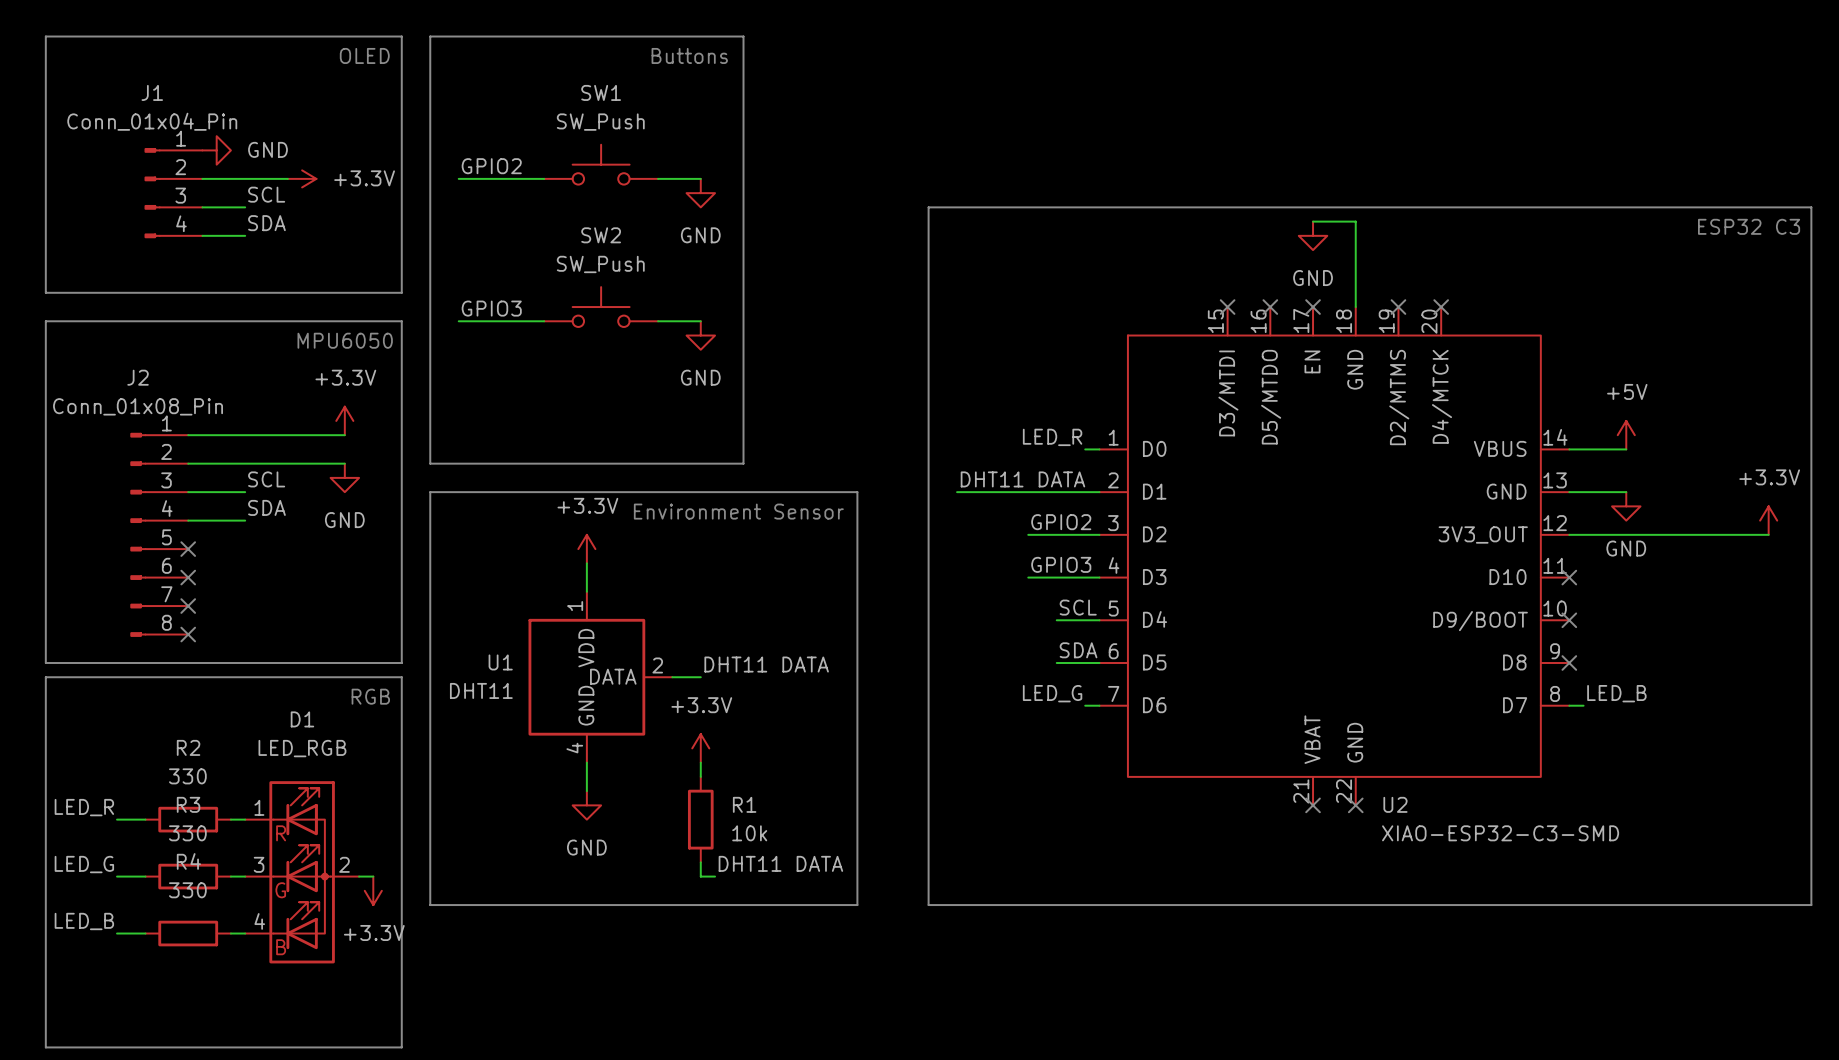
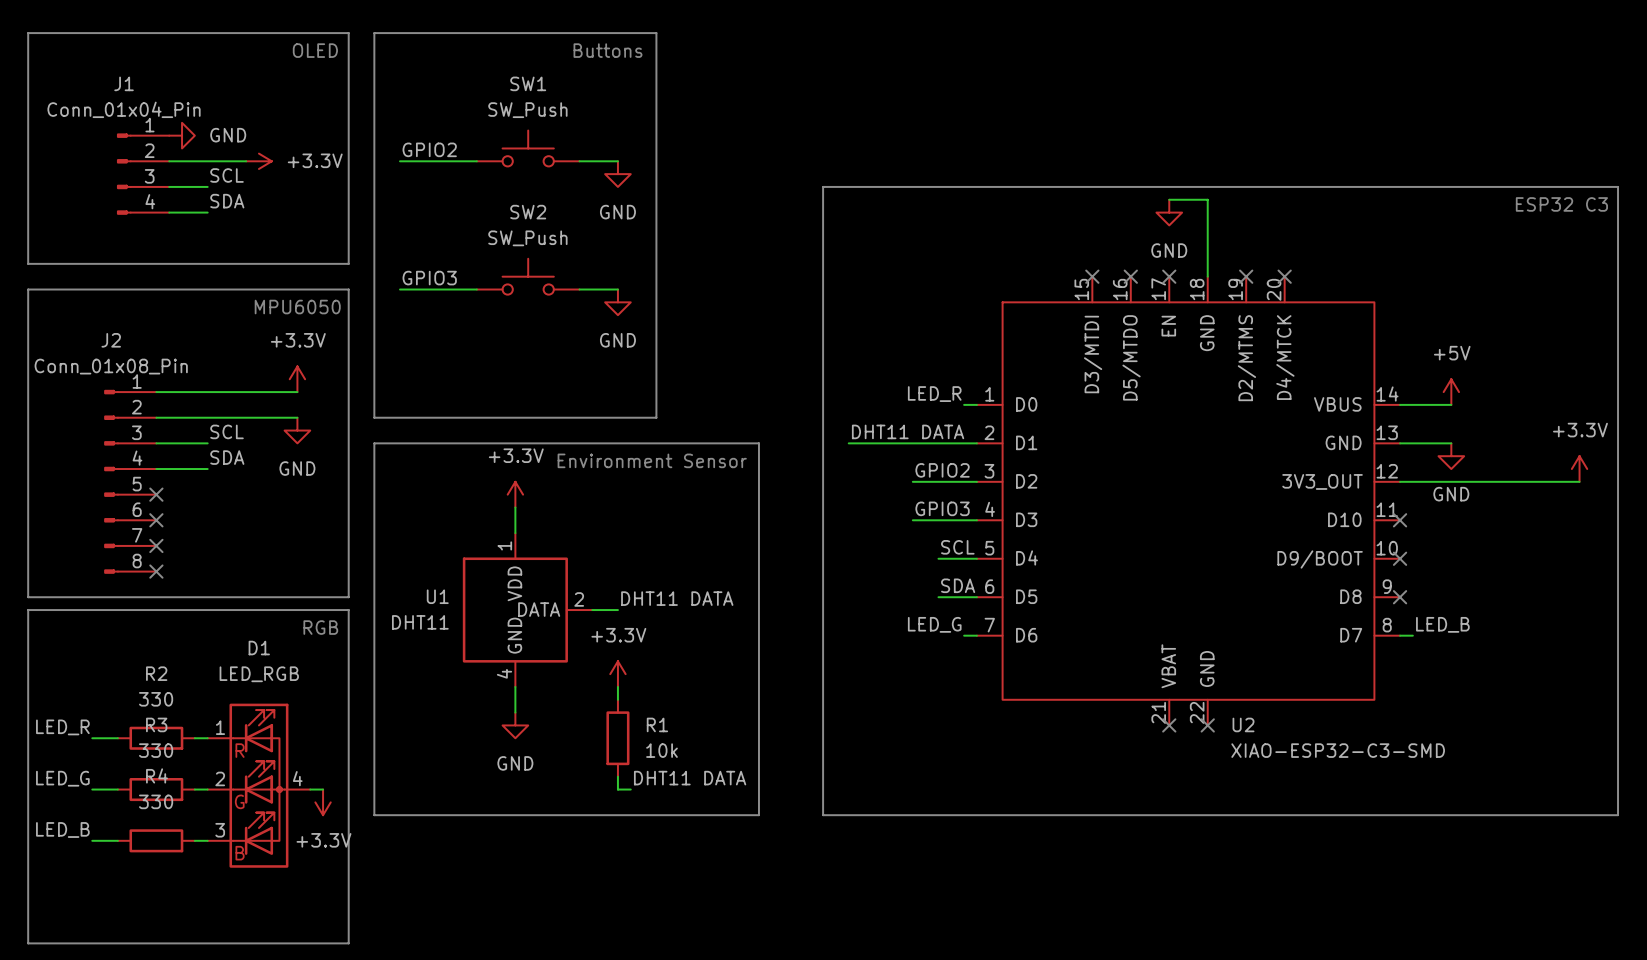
D1 pin number: 3 (259, 864) -> 2 (220, 778)
D1 pin number: 2 (344, 864) -> 4 (297, 778)
D1 pin number: 4 (259, 921) -> 3 (220, 830)

